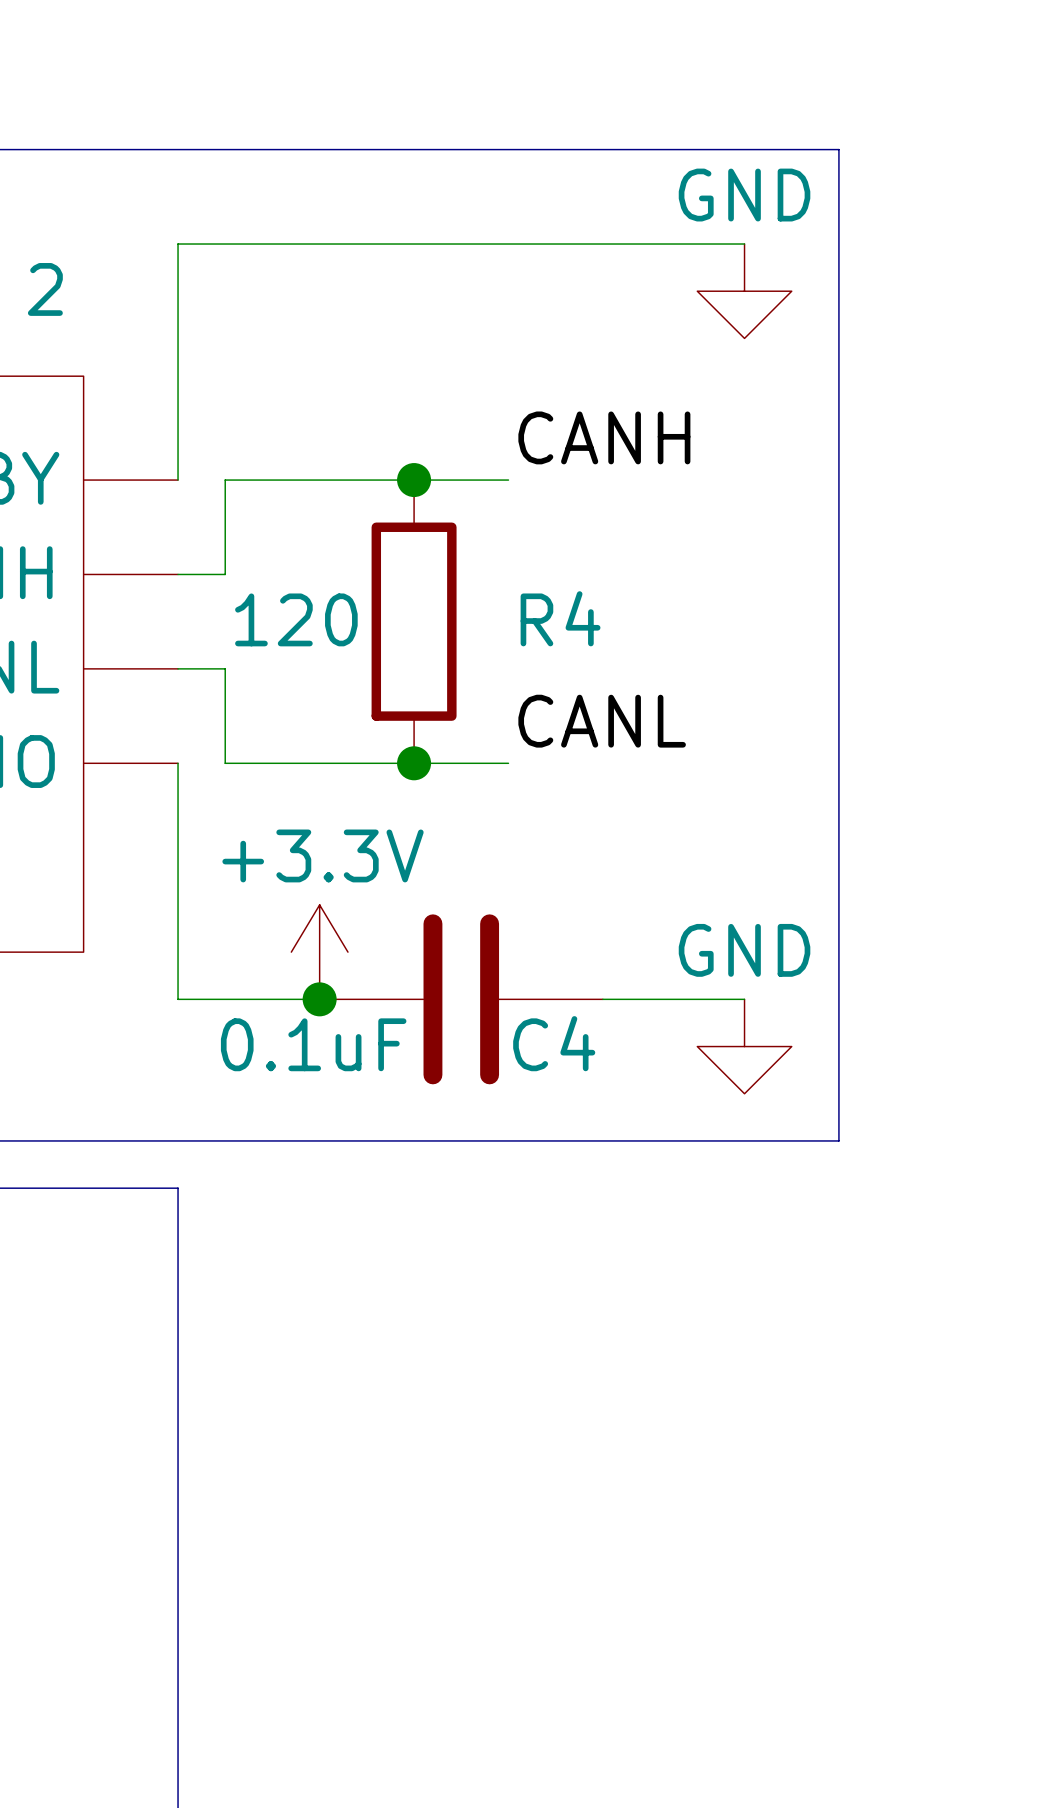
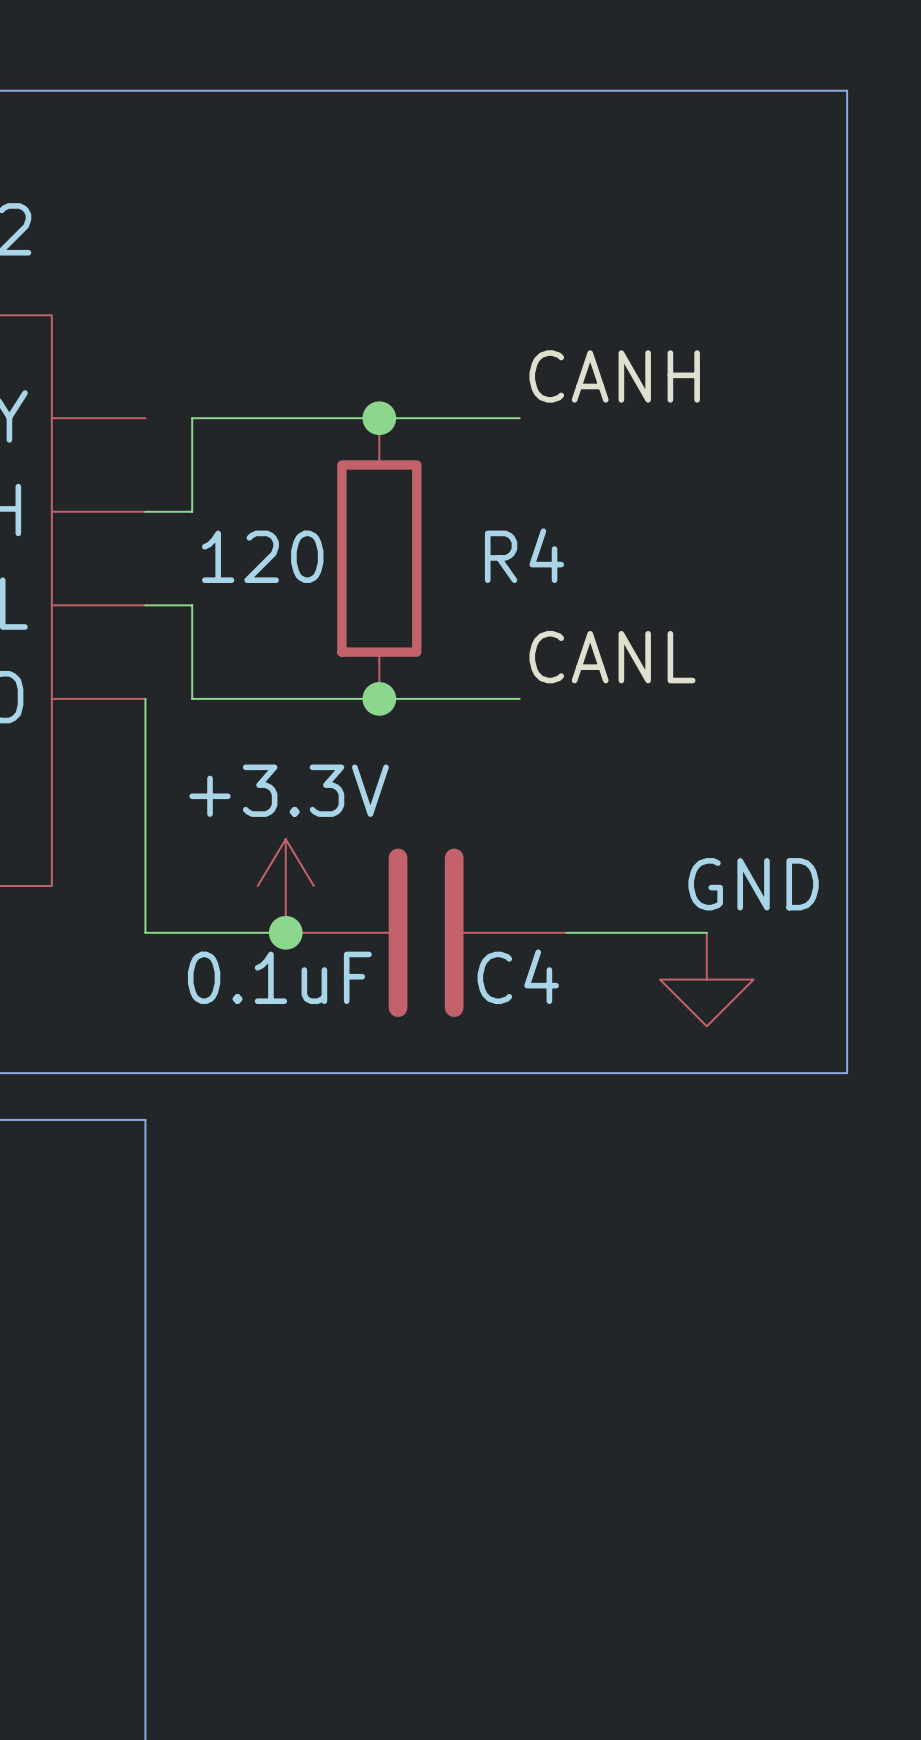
line: (838, 149) (838, 1140) -> (800, 90) (847, 90) (847, 1073) (800, 1073)
wire: (744, 244) (178, 244) (178, 480) -> none
power symbol: GND (744, 291) -> none
label position: CANH (604, 437) -> CANH (614, 376)
wire: none -> (472, 418) (519, 418)
label position: CANL (602, 721) -> CANL (612, 657)
wire: none -> (472, 698) (519, 698)
power symbol text position: GND (744, 950) -> GND (753, 884)

